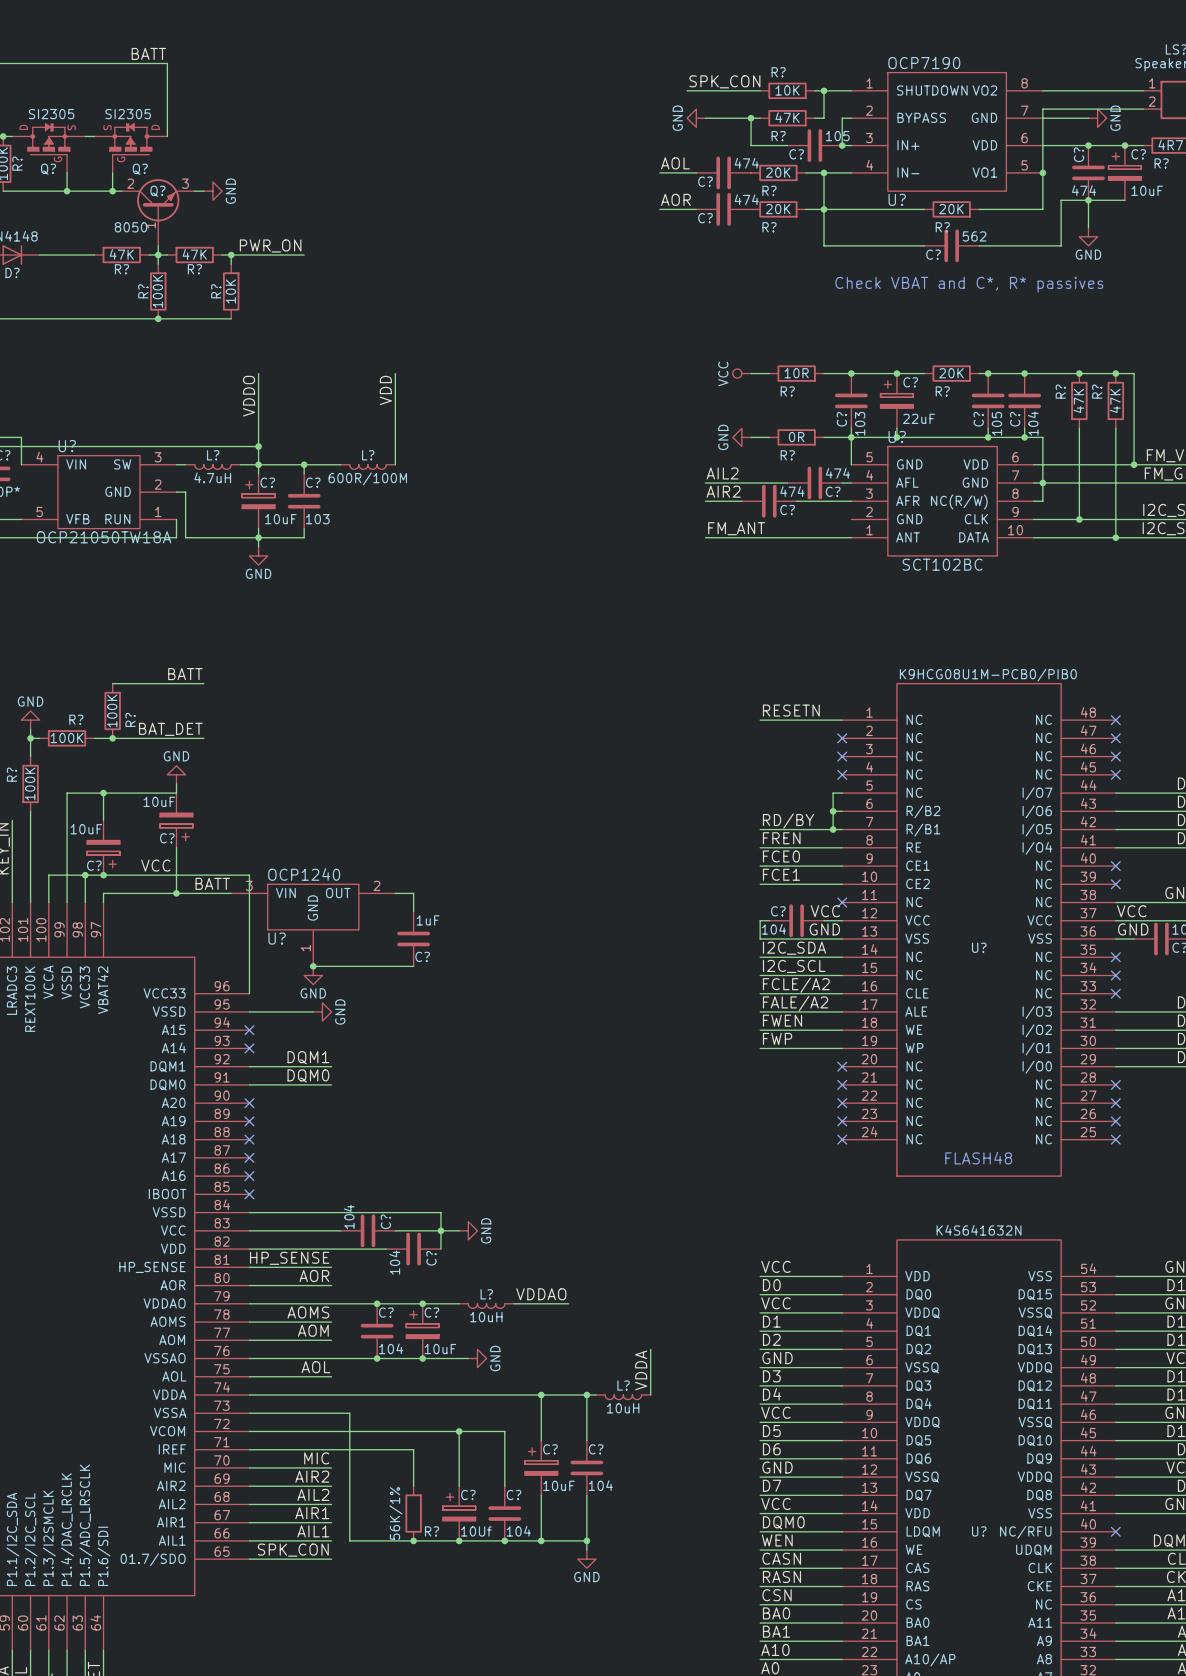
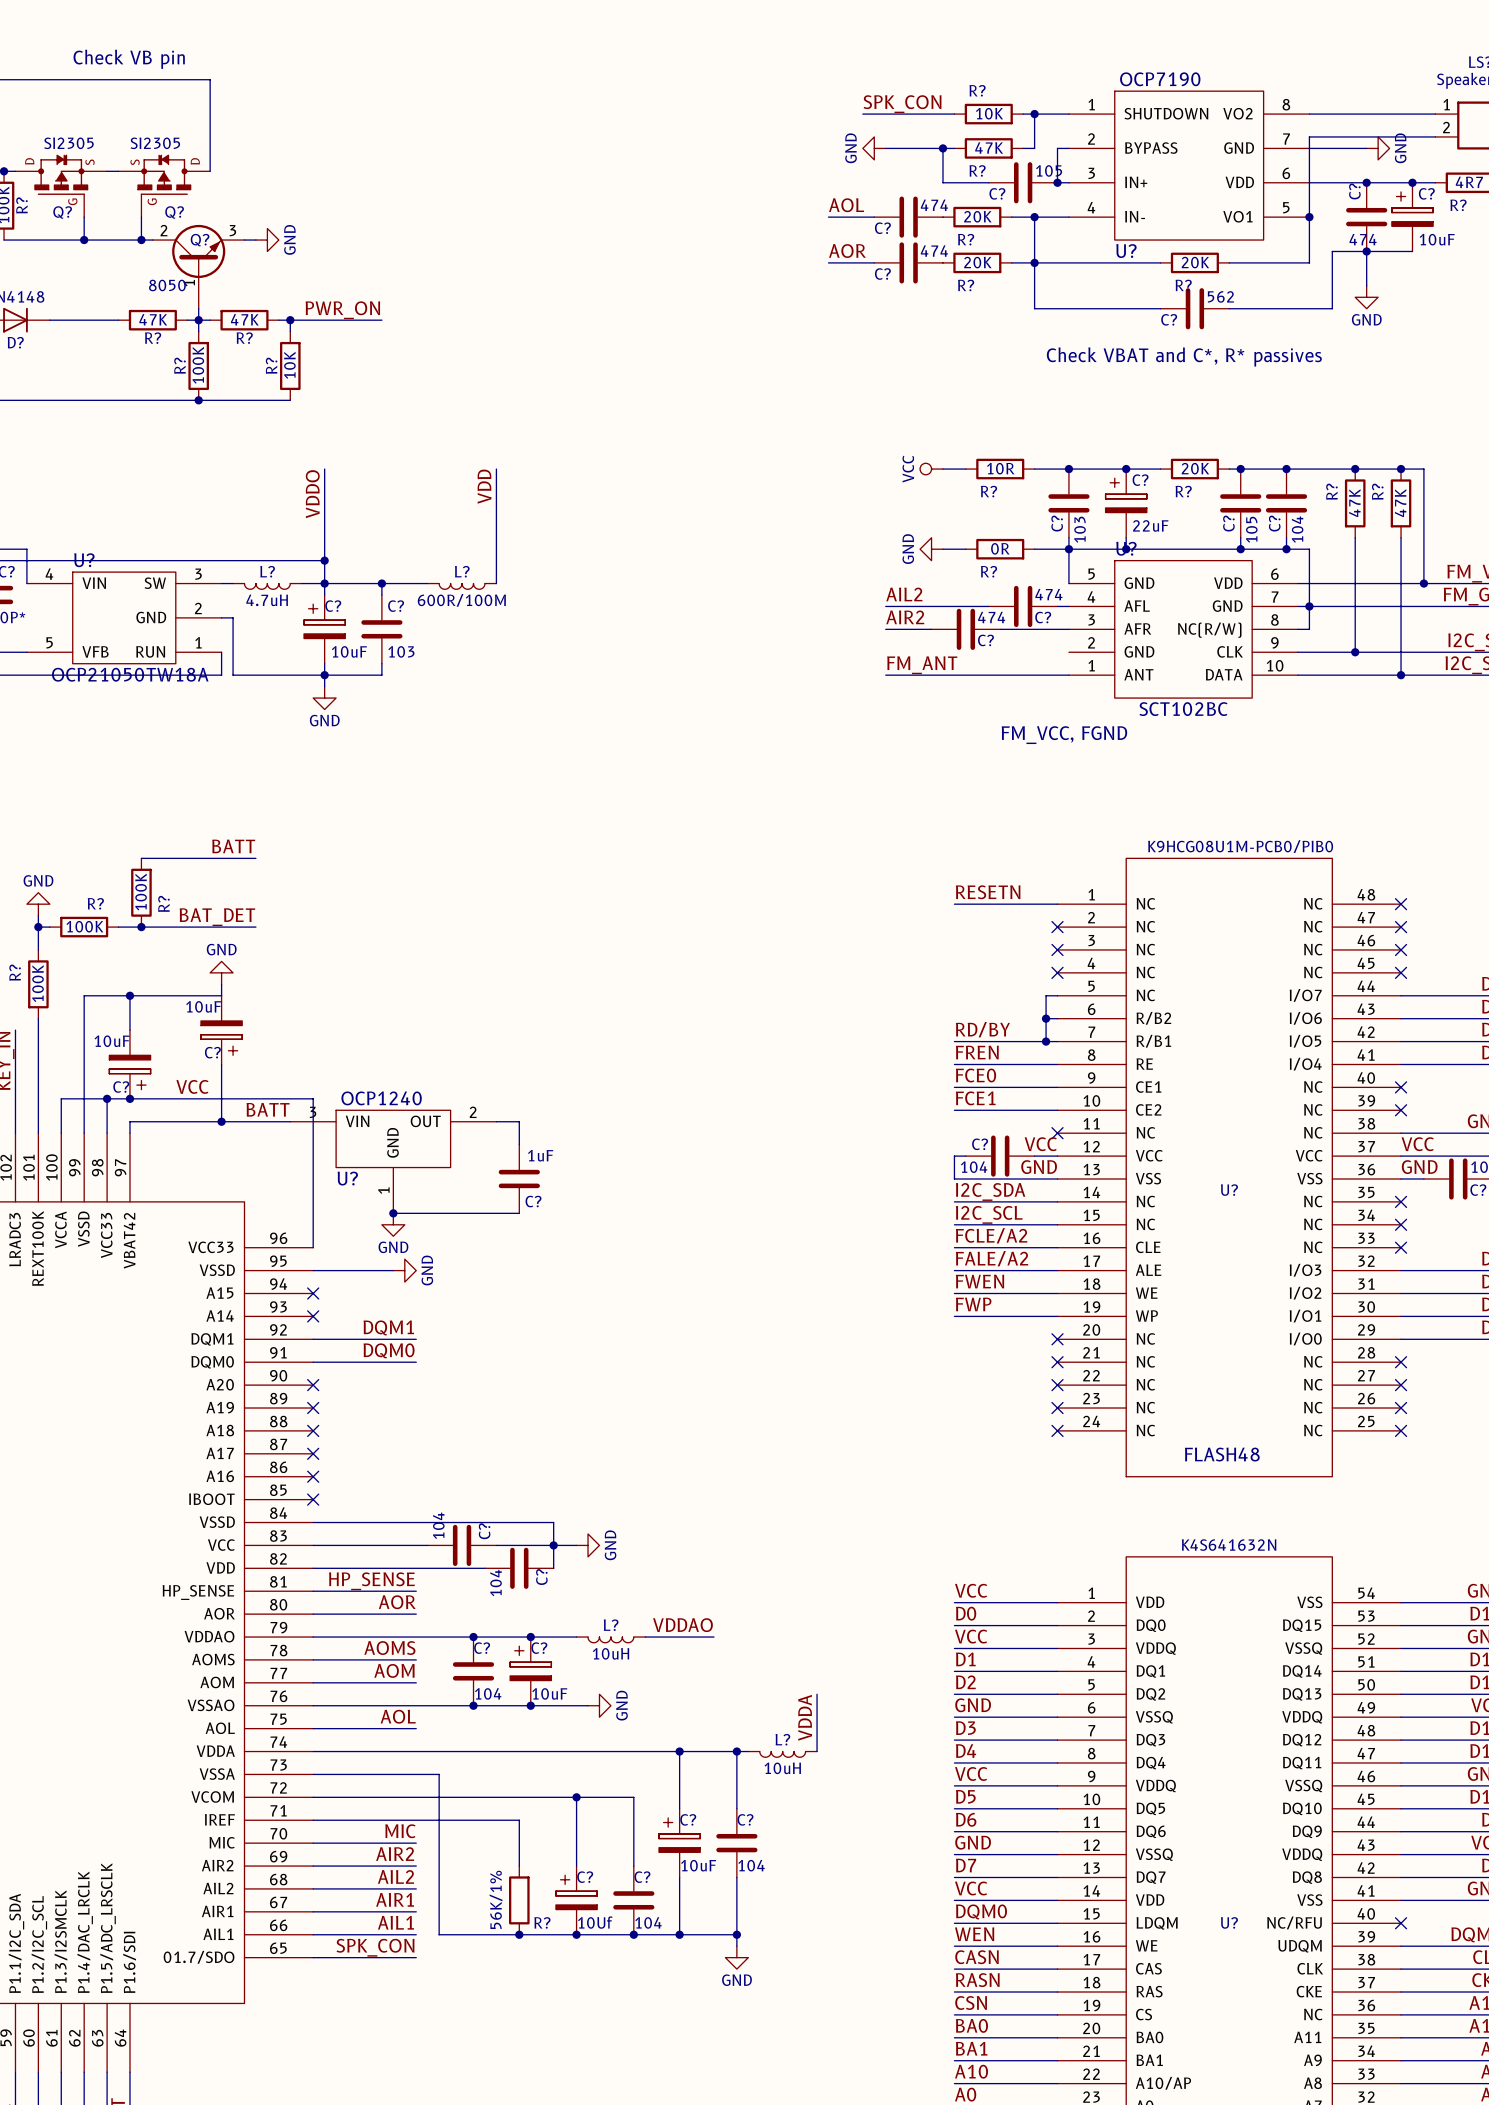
text: none -> Check VB pin (129, 59)
label: BATT (148, 53) -> none
text: none -> FM_VCC, FGND (1064, 735)

